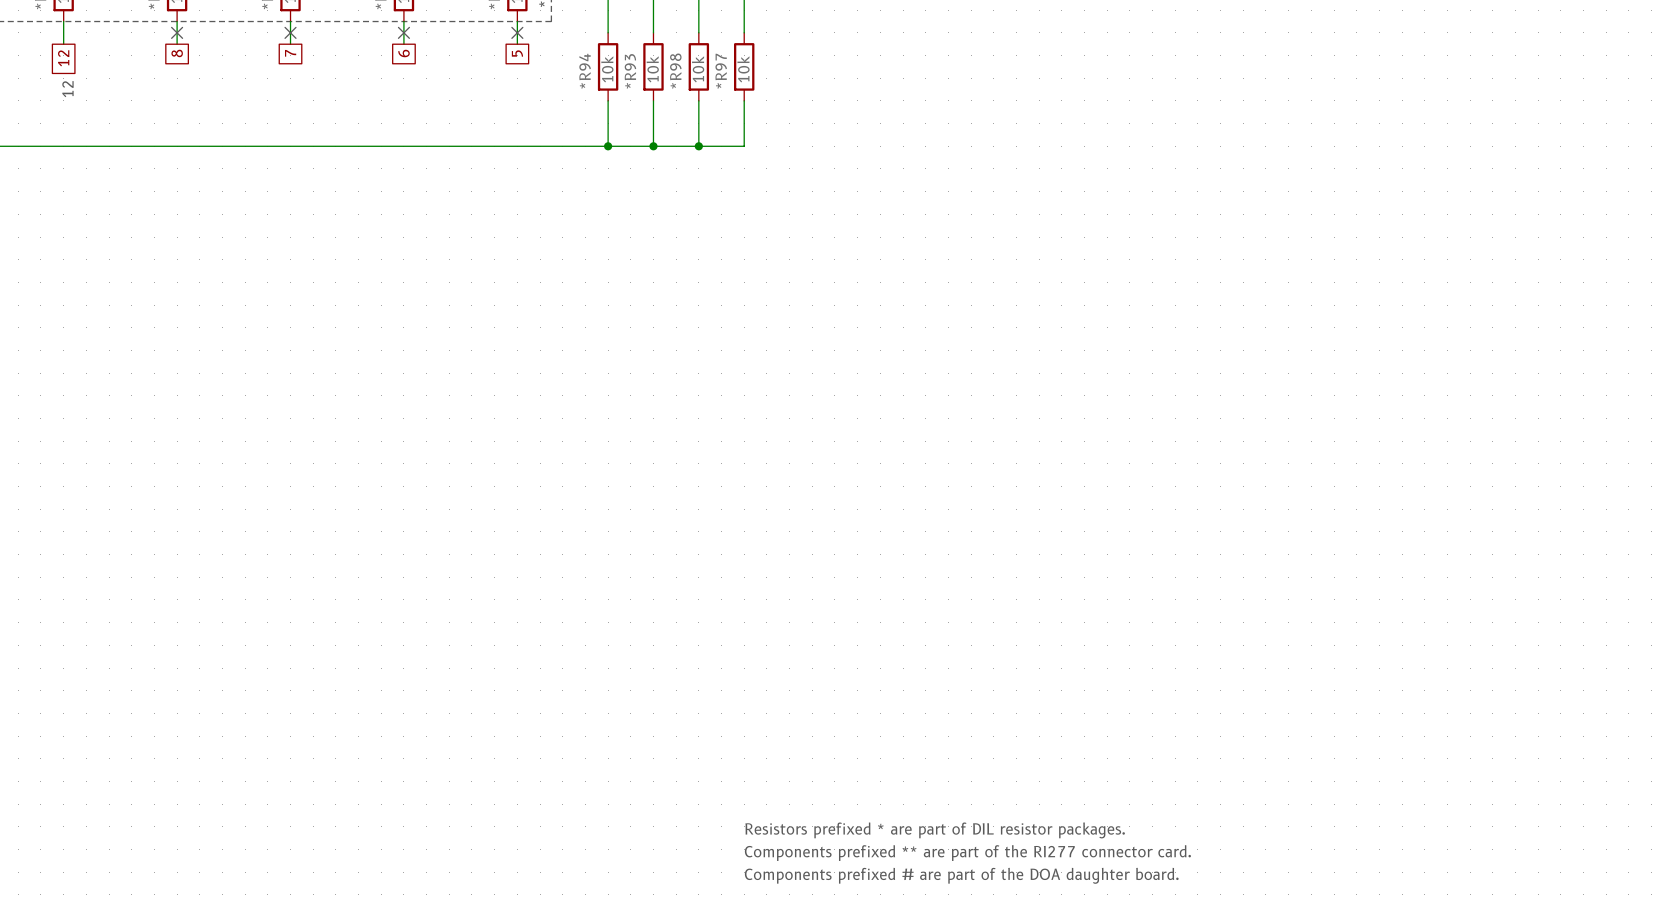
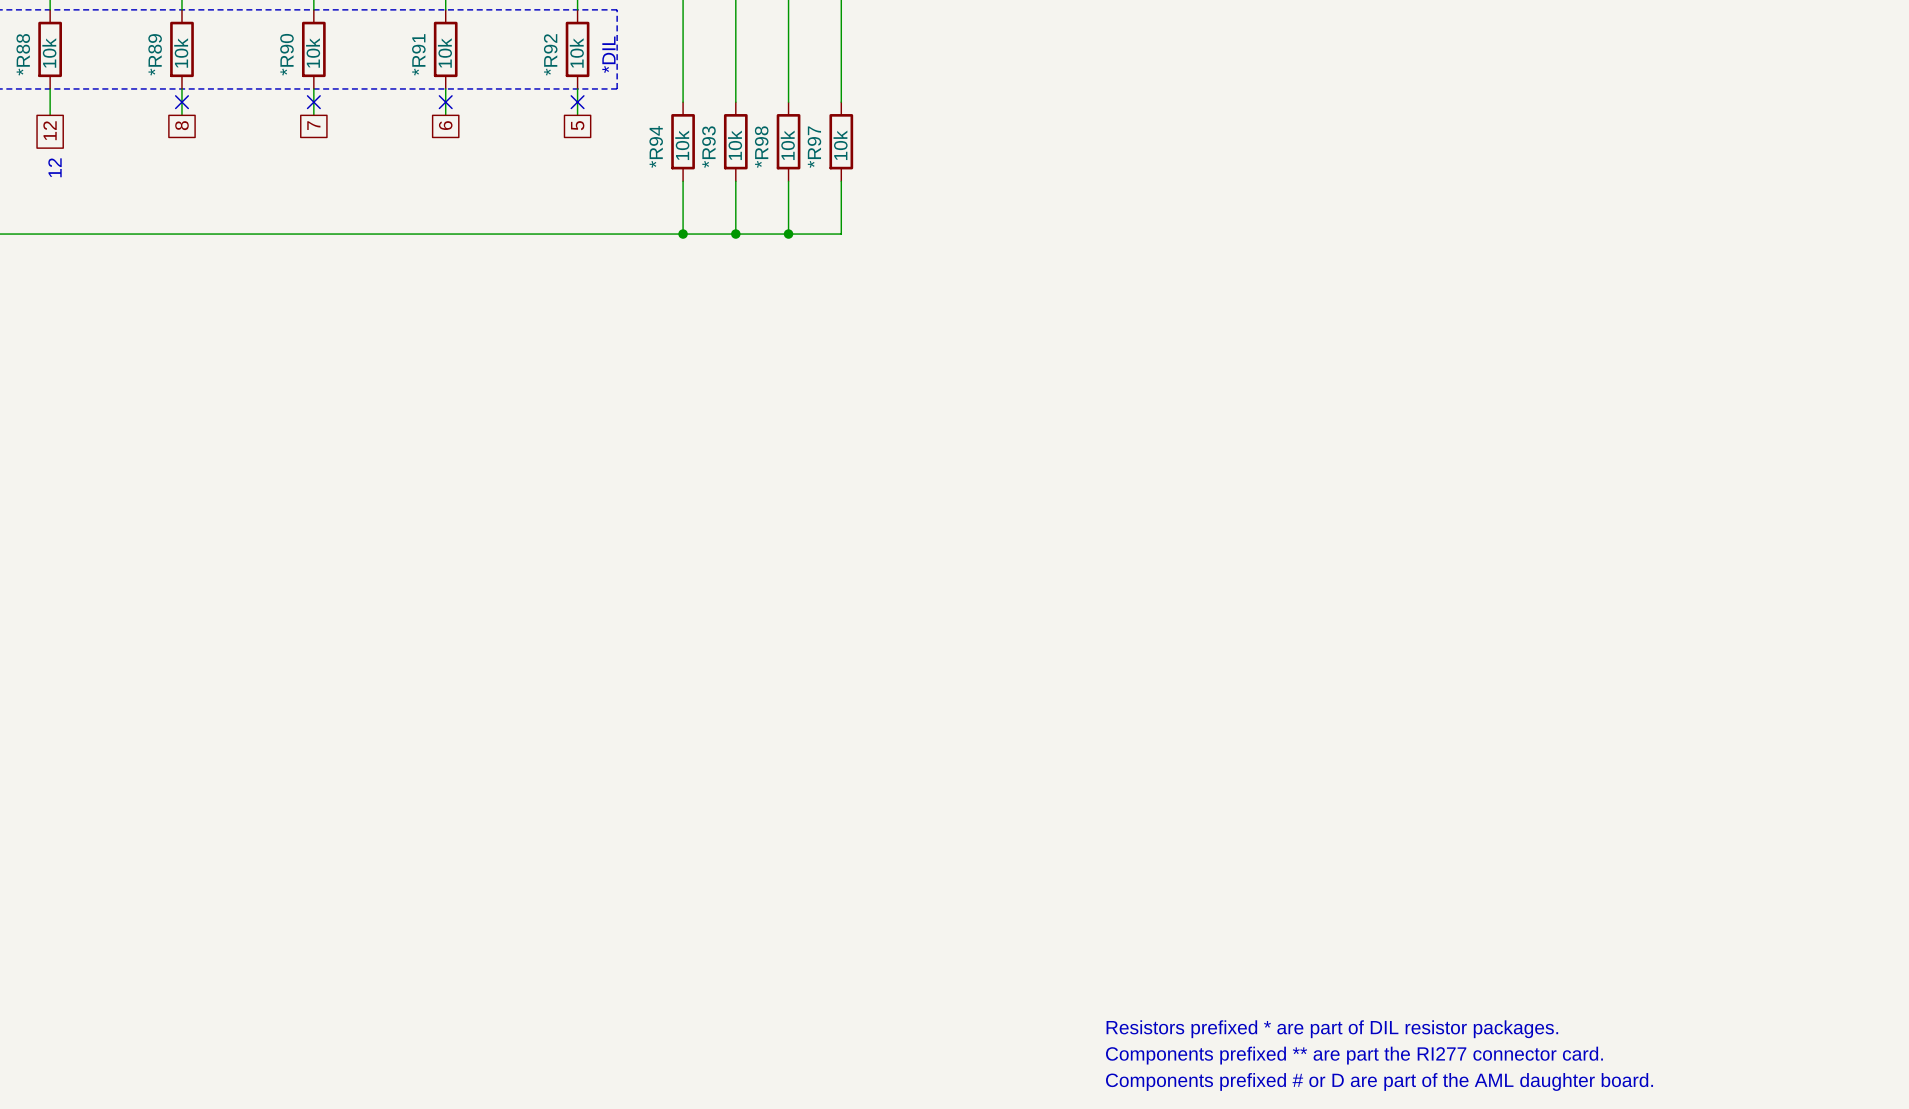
text: Resistors prefixed * are part of DIL resistor packages. (935, 830) -> none
text: none -> Resistors prefixed * are part of DIL resistor packages. (1332, 1029)
text: Components prefixed ** are part of the RI277 connector card. (967, 853) -> none
text: none -> Components prefixed ** are part the RI277 connector card. (1354, 1055)
text: Components prefixed # are part of the DOA daughter board. (961, 875) -> none
text: none -> Components prefixed # or D are part of the AML daughter board. (1379, 1081)

